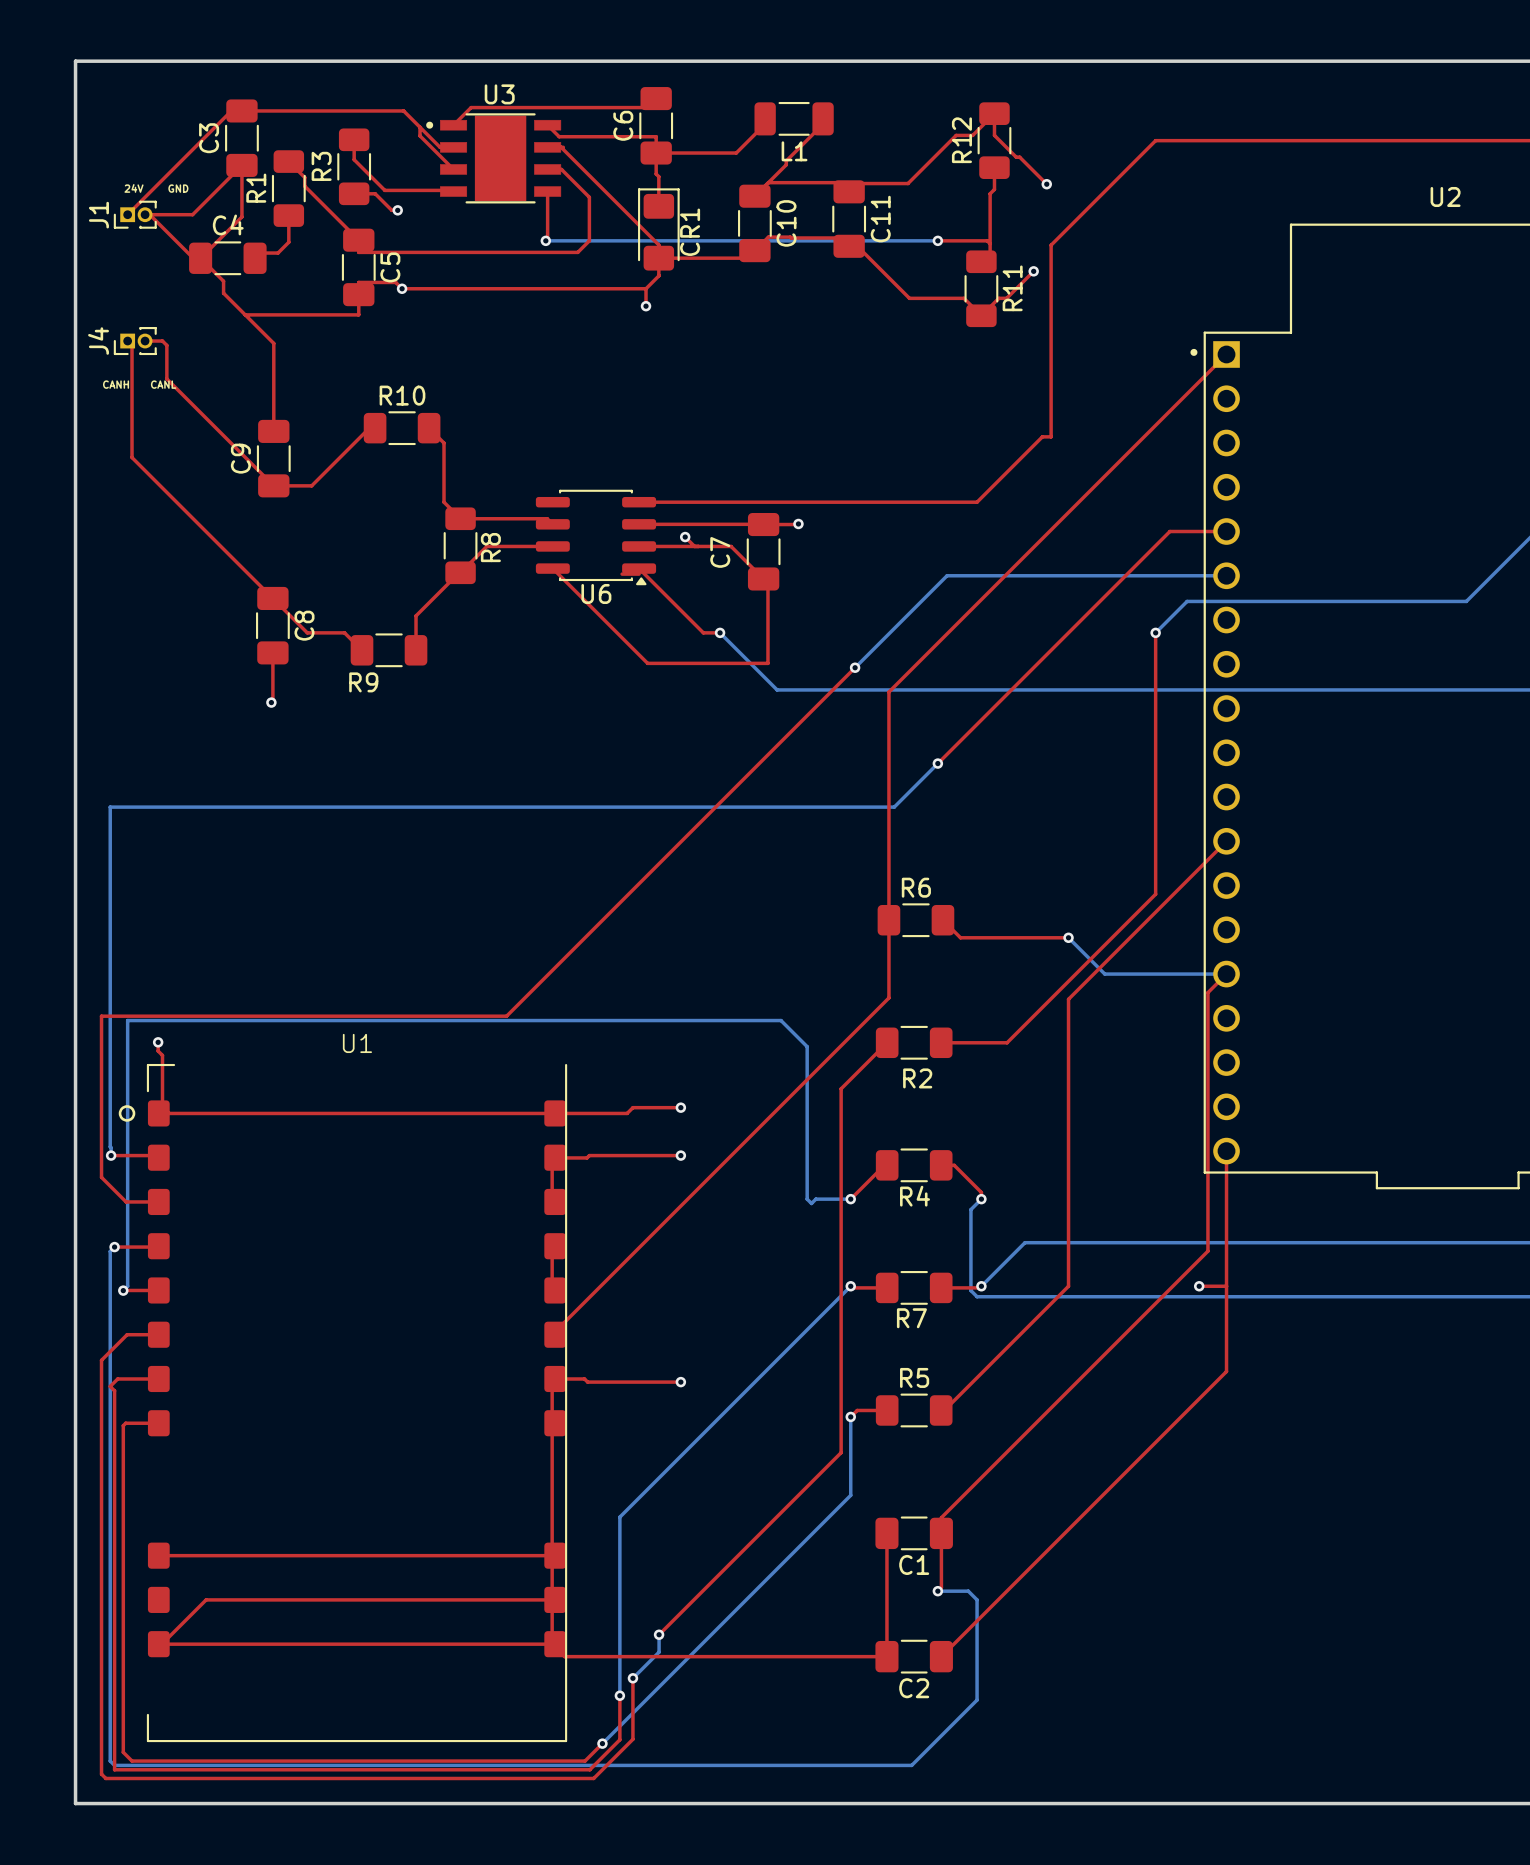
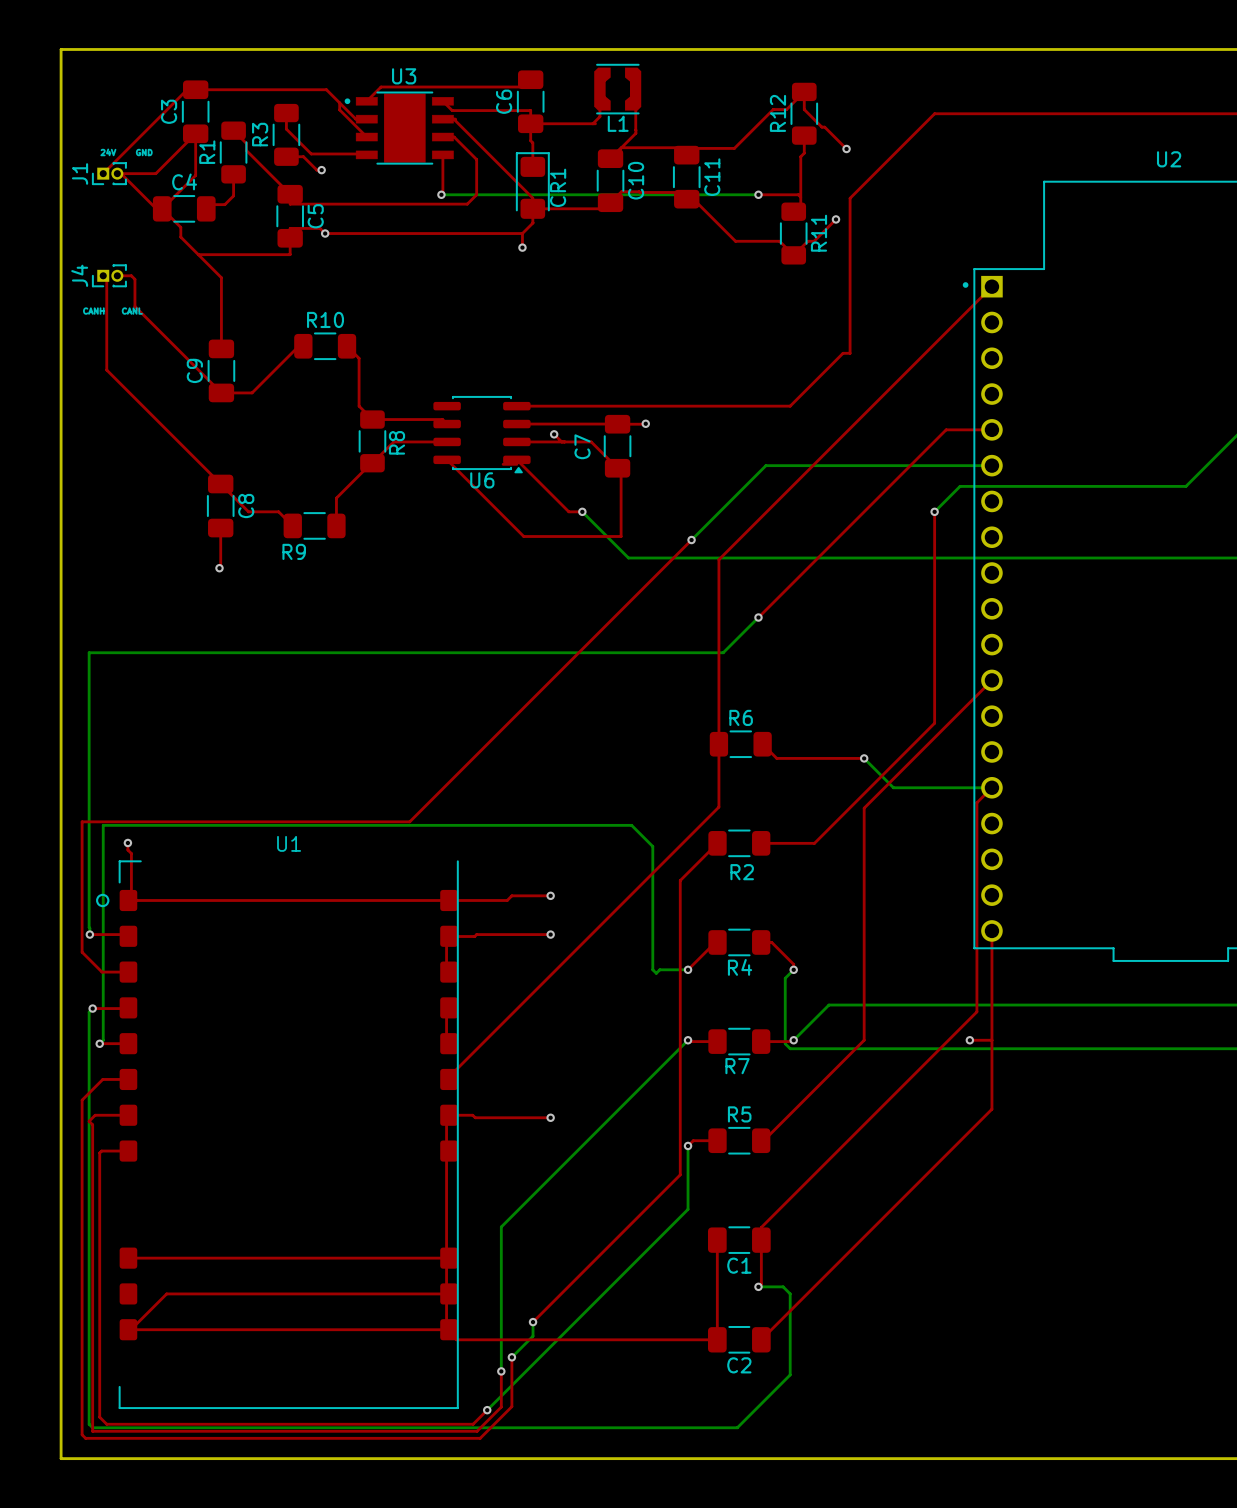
L1 footprint: [754, 101, 834, 136] -> [594, 63, 642, 115]
top track: none -> (599, 89) (599, 116) (592, 123)
top track: (765, 118) (765, 124) (736, 153) -> none
top track: (823, 118) (823, 124) (786, 160) -> (635, 89) (635, 130)

